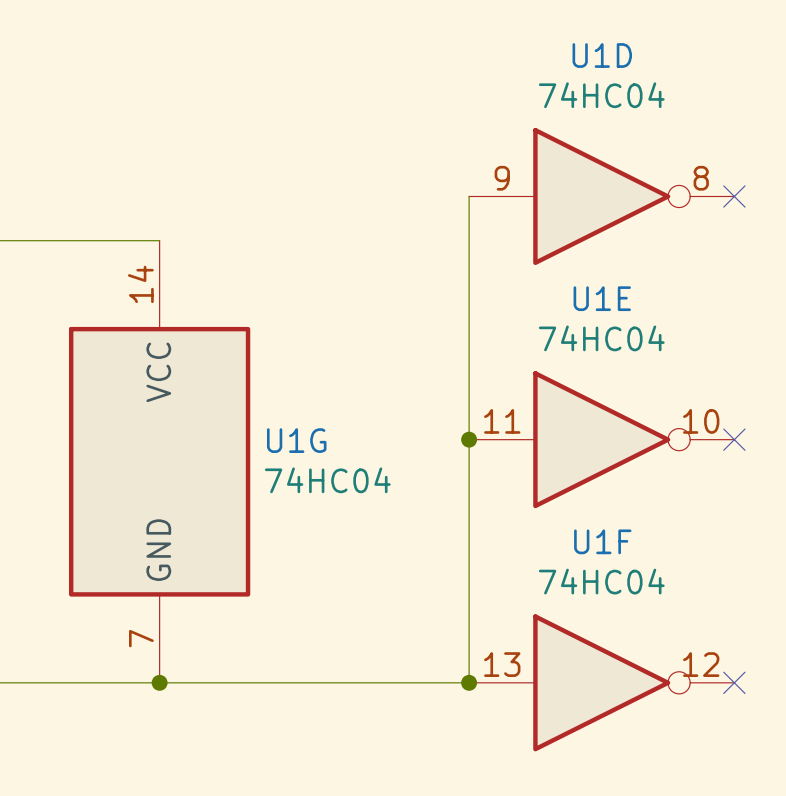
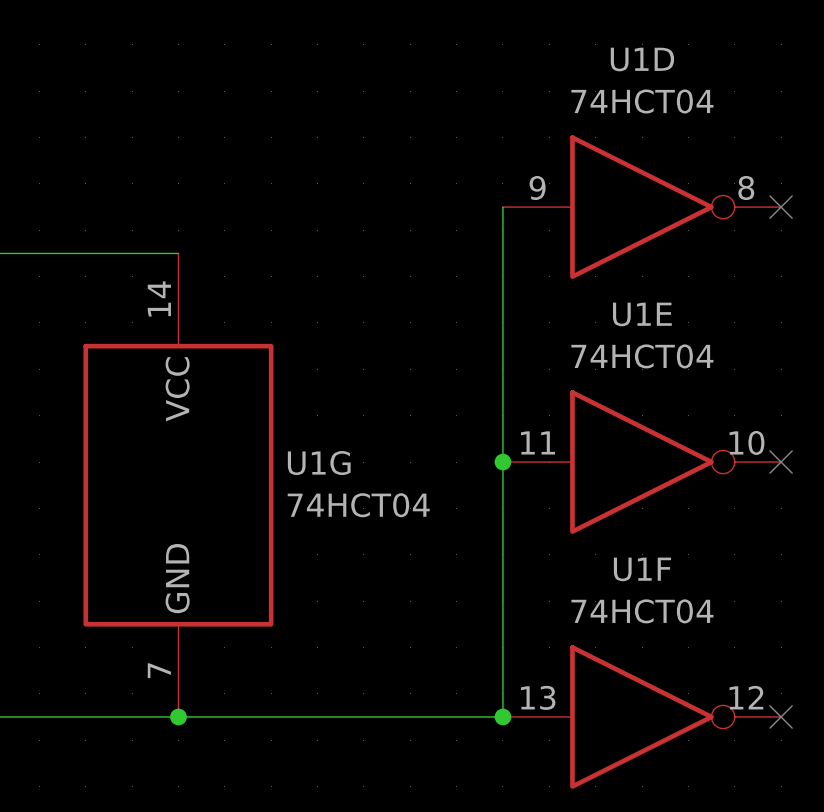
U1D value: 74HC04 (601, 95) -> 74HCT04 (642, 101)
U1E value: 74HC04 (601, 338) -> 74HCT04 (642, 356)
U1G value: 74HC04 (327, 480) -> 74HCT04 (358, 505)
U1F value: 74HC04 (601, 581) -> 74HCT04 (642, 611)

